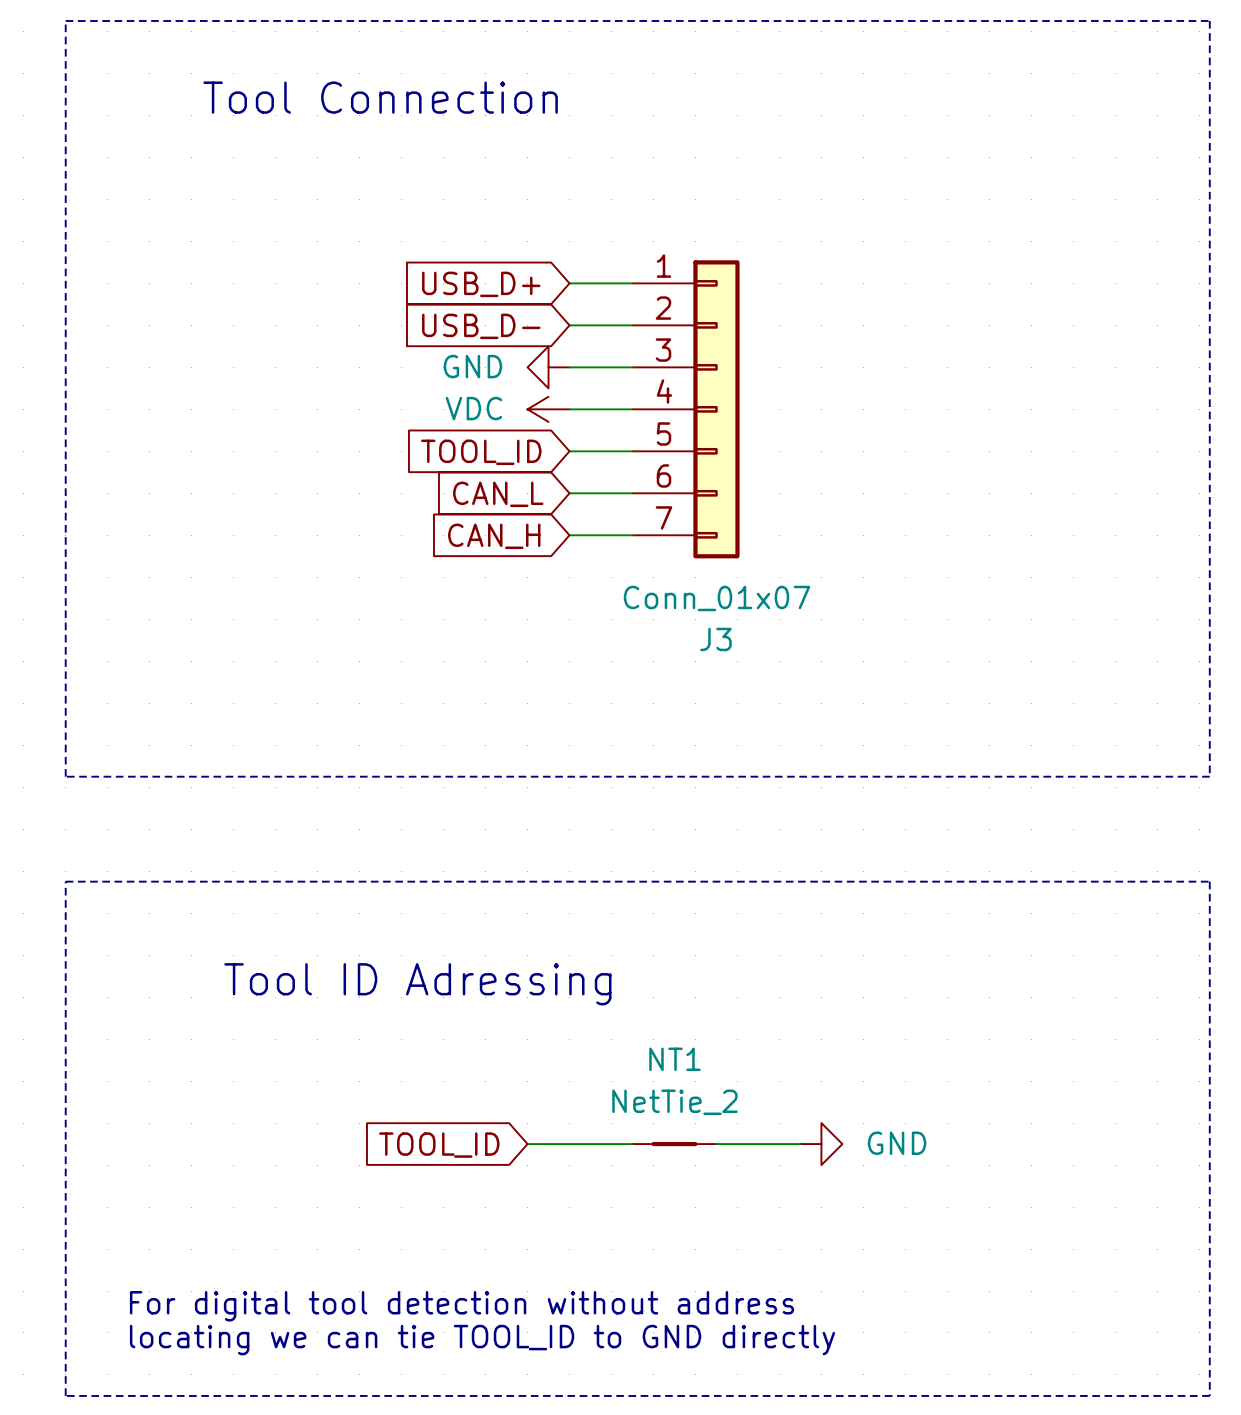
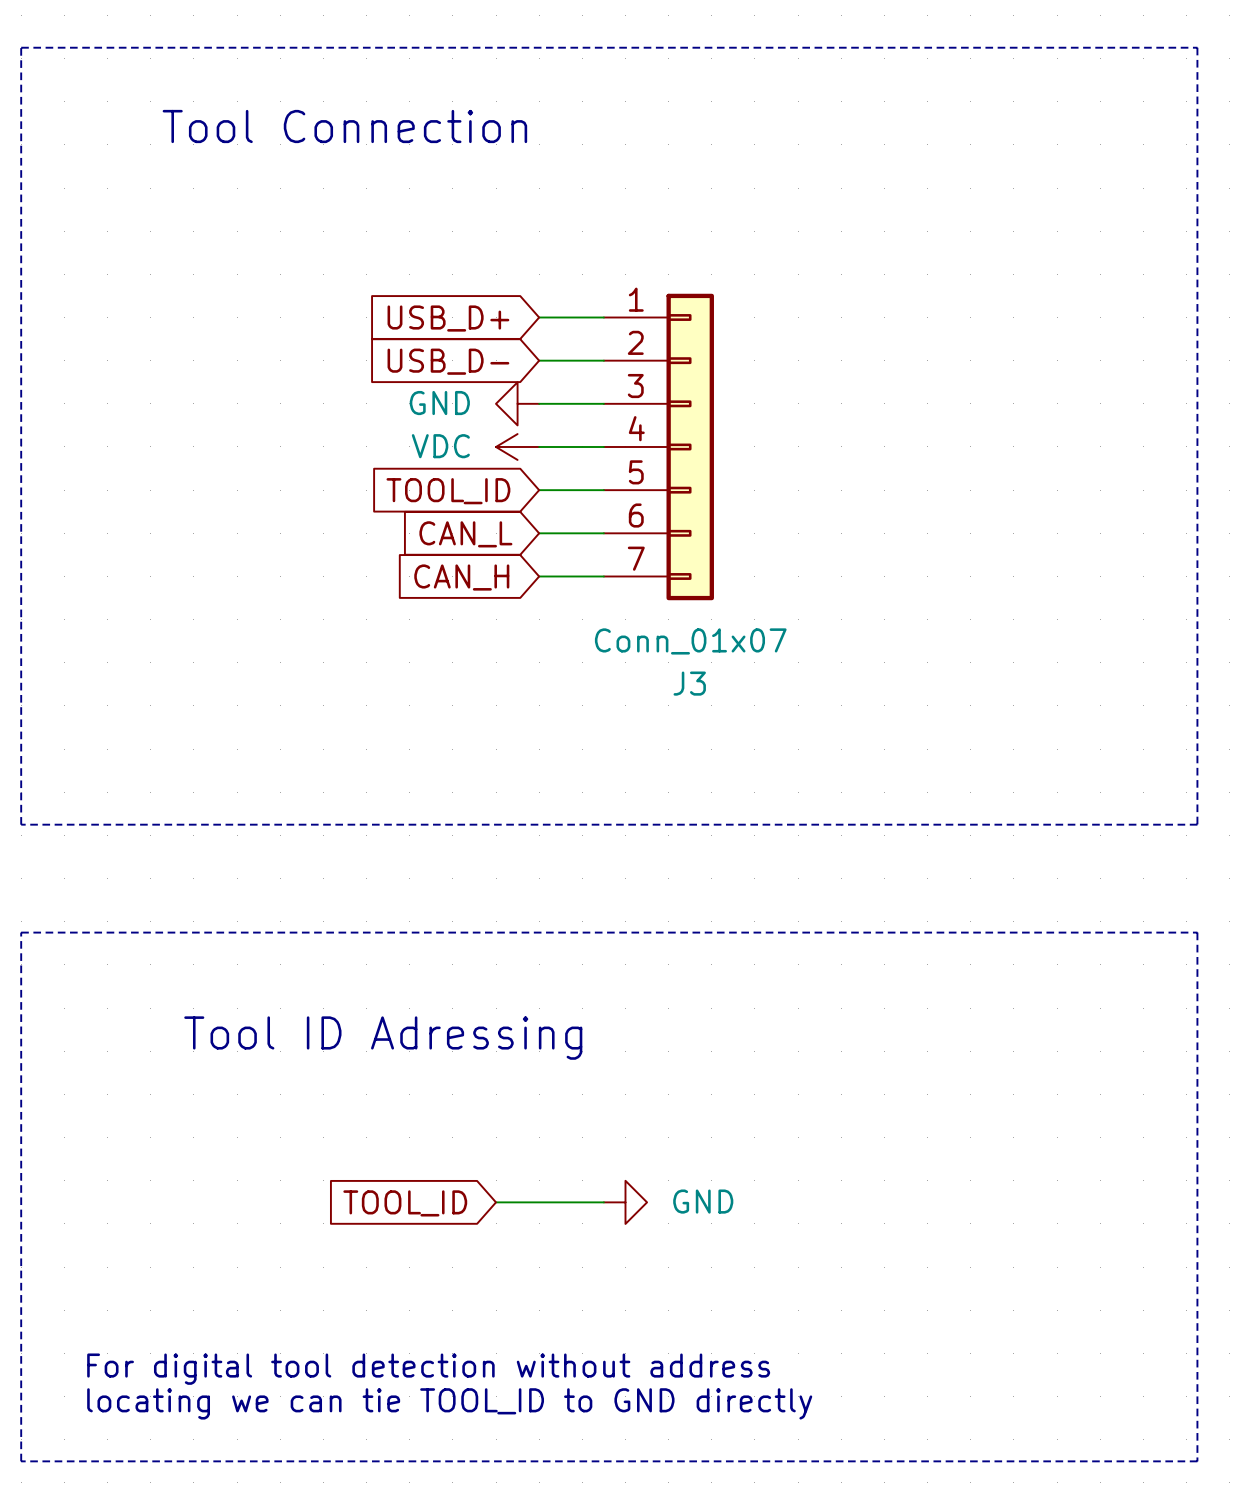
NT1: NetTie_2 (674, 1144) -> none
wire: (716, 1144) (800, 1144) -> none
power symbol position: GND (821, 1144) -> GND (625, 1202)

